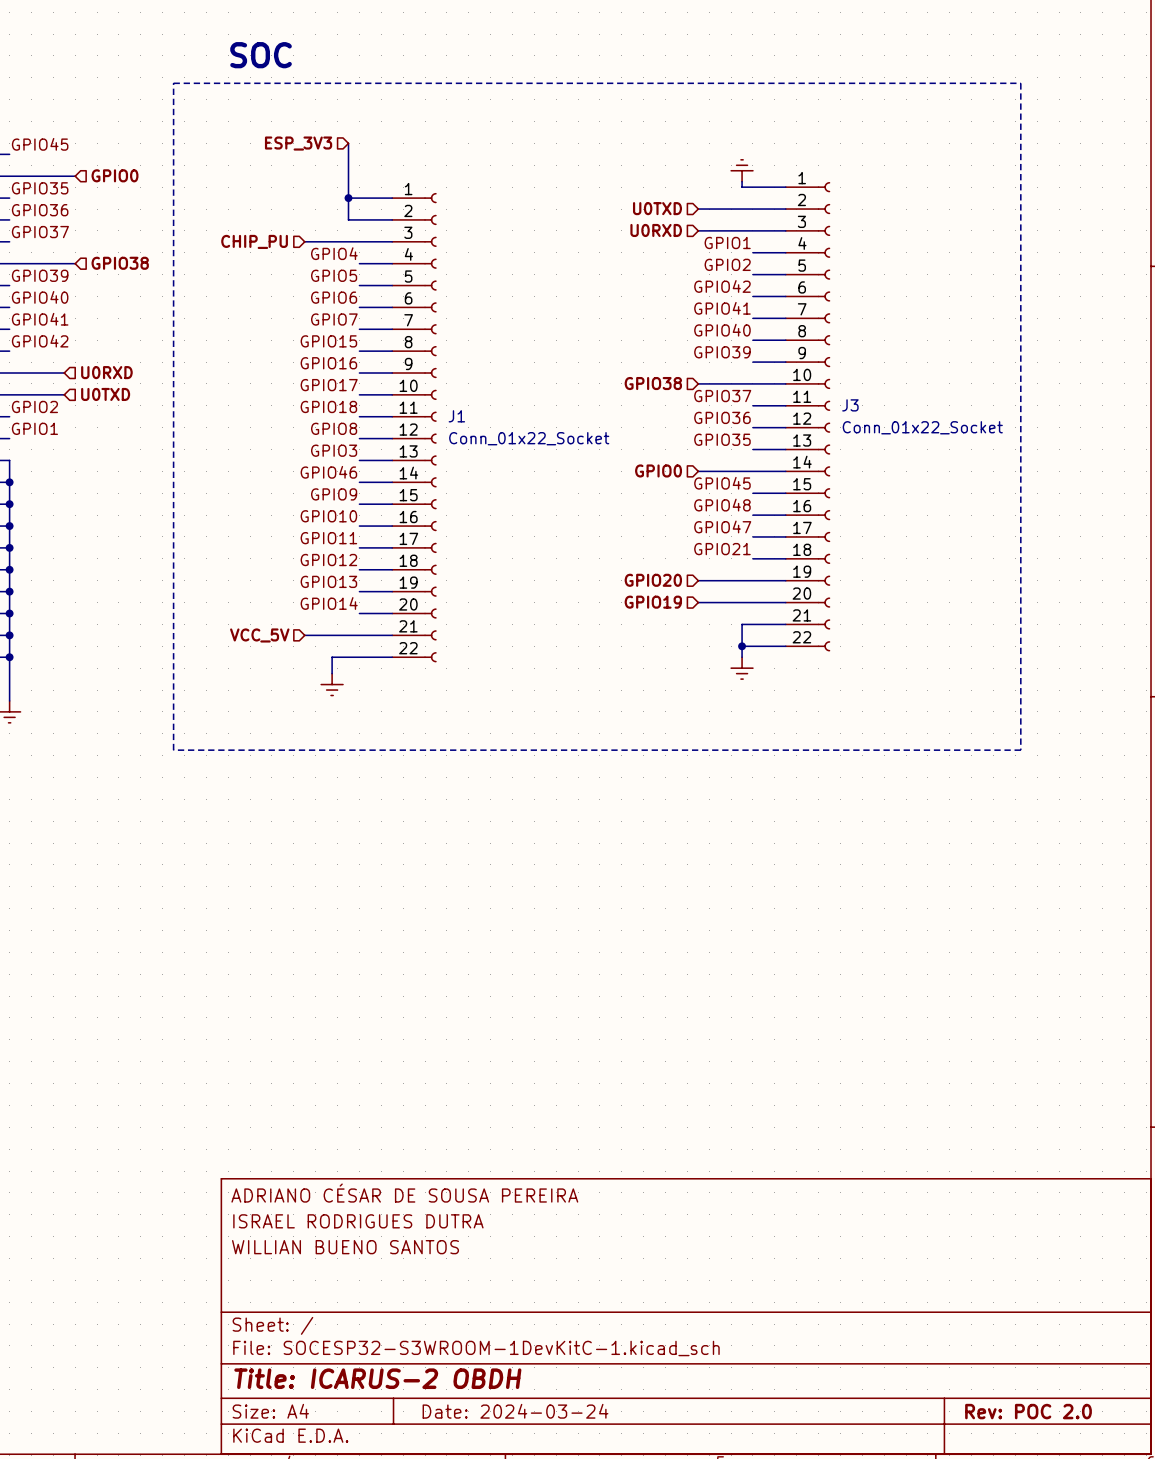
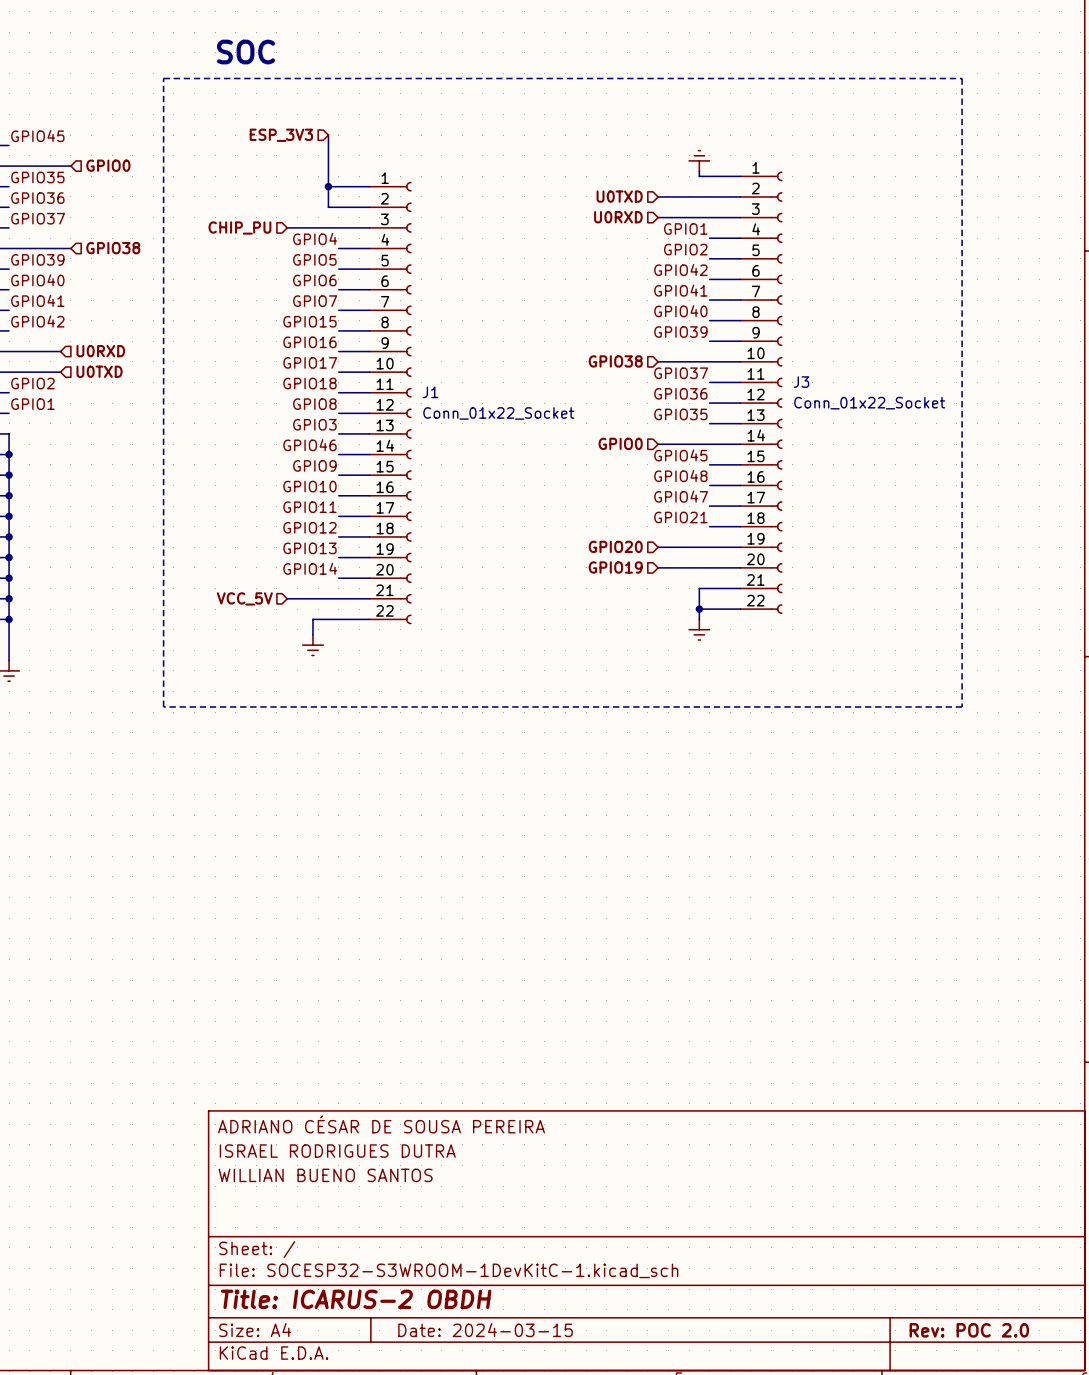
title block: Date: 2024-03-24 (515, 1411) -> Date: 2024-03-15 (485, 1330)

